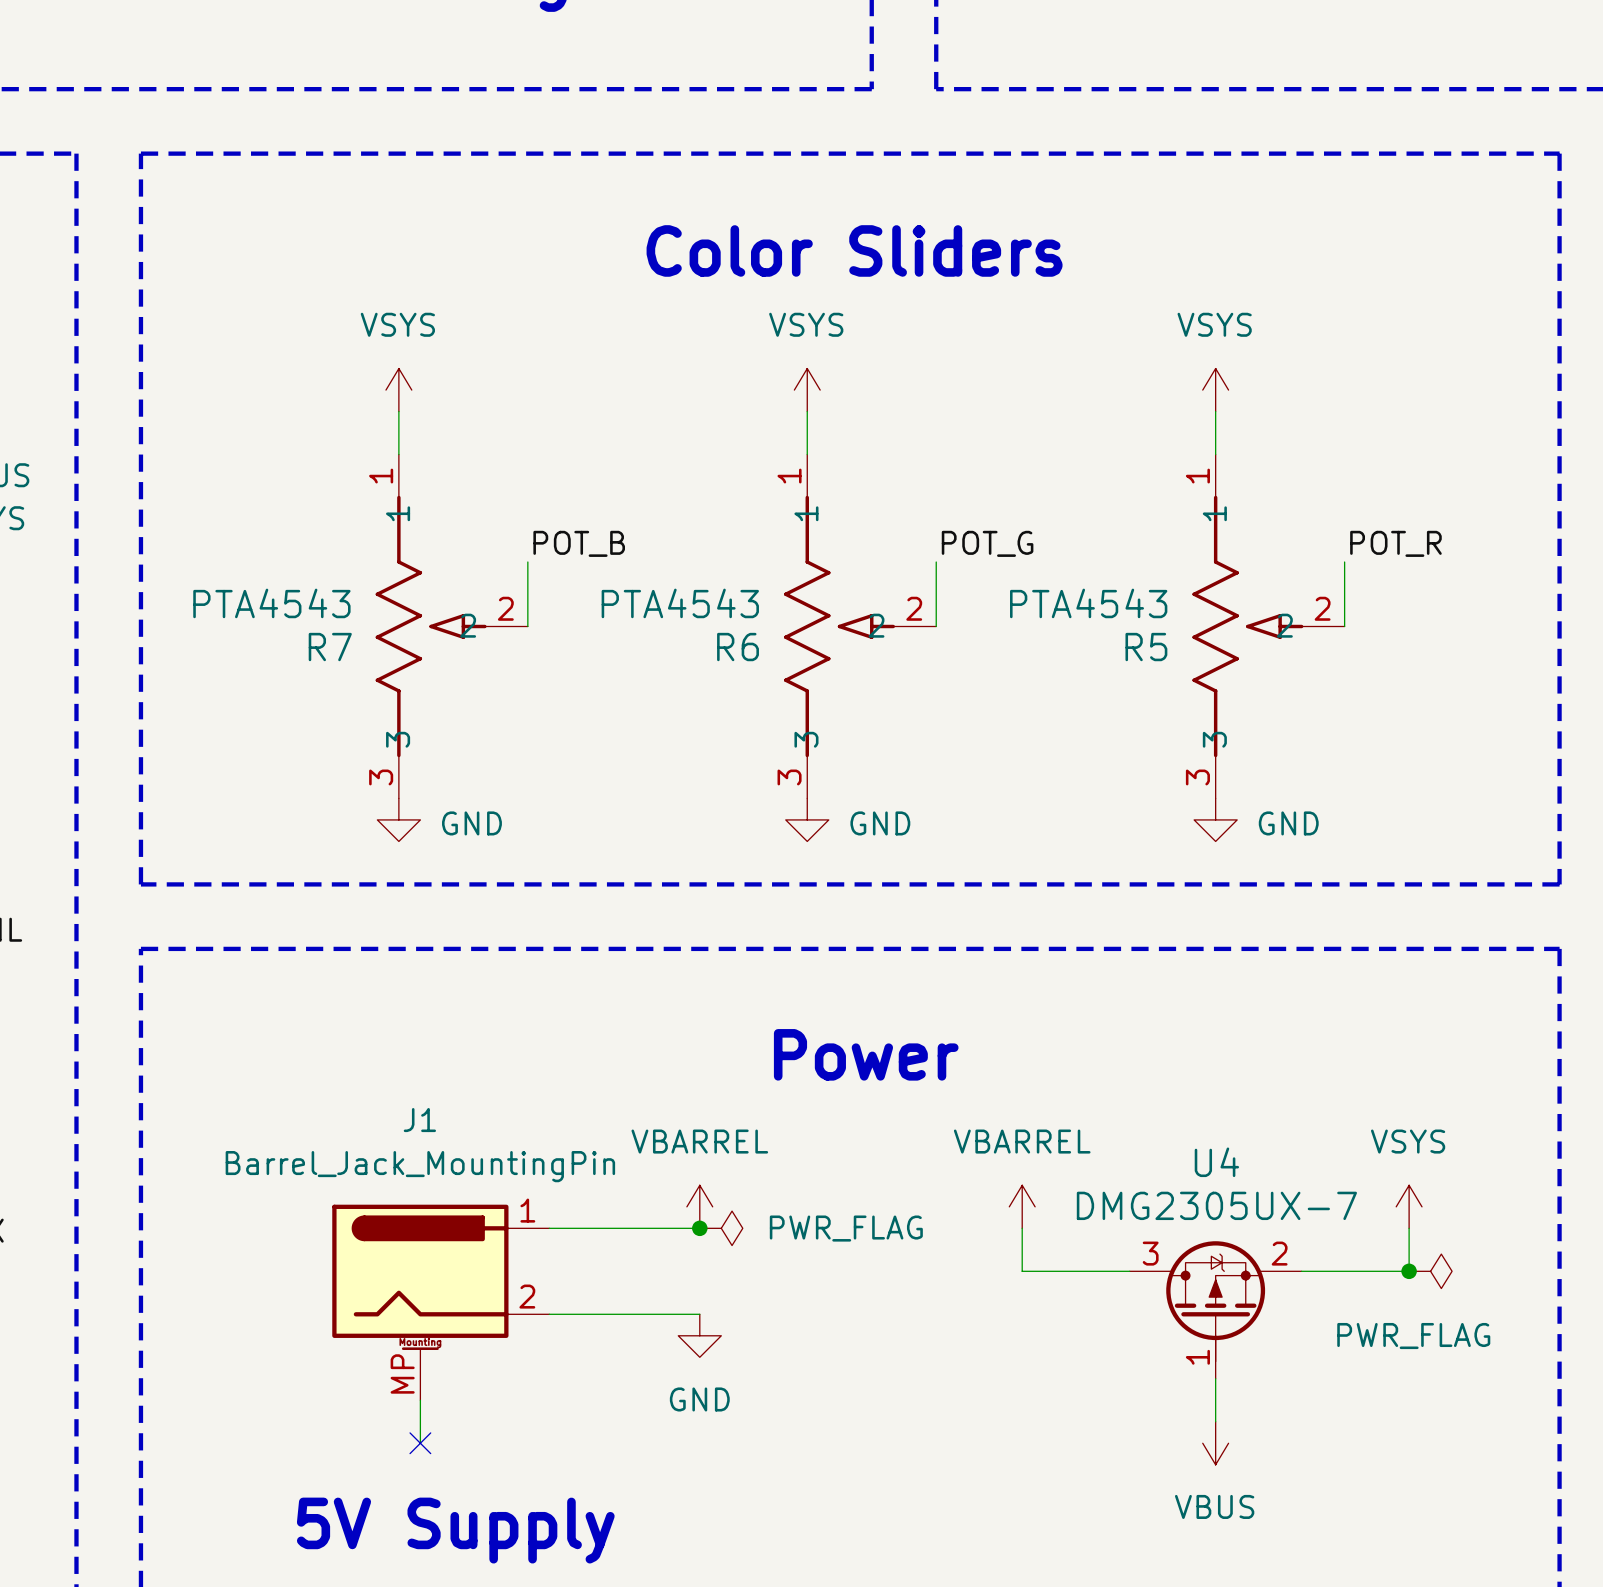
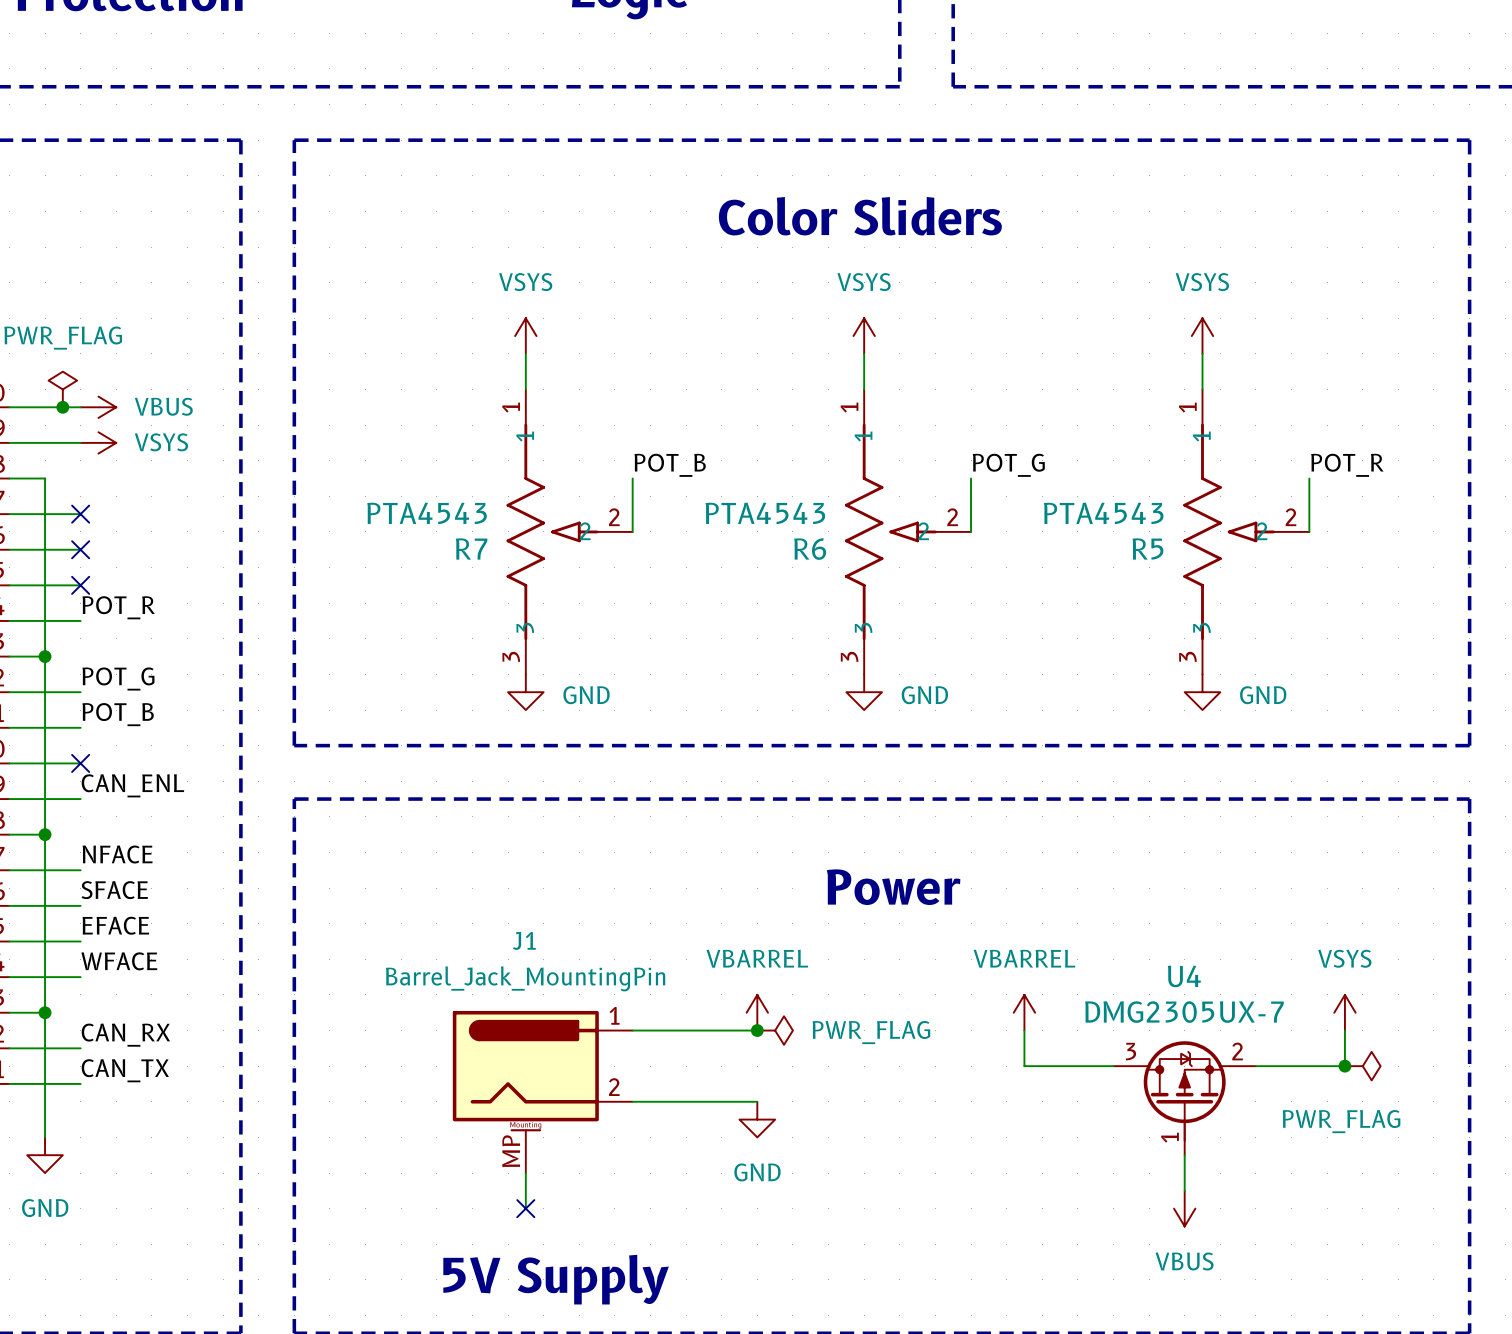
text position: Color Sliders (854, 250) -> Color Sliders (860, 216)
power symbol position: VSYS (398, 390) -> VSYS (525, 336)
power symbol position: VSYS (807, 390) -> VSYS (864, 336)
power symbol position: VSYS (1215, 390) -> VSYS (1202, 336)
wire: (398, 411) (398, 454) -> (525, 353) (525, 389)
wire: (807, 411) (807, 454) -> (864, 353) (864, 389)
wire: (1215, 411) (1215, 454) -> (1202, 353) (1202, 389)
label position: POT_B (579, 543) -> POT_B (670, 465)
label position: POT_G (987, 543) -> POT_G (1008, 465)
label position: POT_R (1395, 543) -> POT_R (1347, 465)
wire: (527, 562) (527, 626) -> (632, 478) (632, 531)
wire: (936, 562) (936, 626) -> (971, 478) (971, 531)
wire: (1344, 562) (1344, 626) -> (1309, 478) (1309, 531)
R7 position: (451, 626) -> (569, 531)
R6 position: (860, 626) -> (907, 531)
R5 position: (1268, 626) -> (1246, 531)
power symbol position: GND (398, 819) -> GND (525, 692)
power symbol position: GND (807, 819) -> GND (864, 692)
power symbol position: GND (1215, 819) -> GND (1202, 692)

